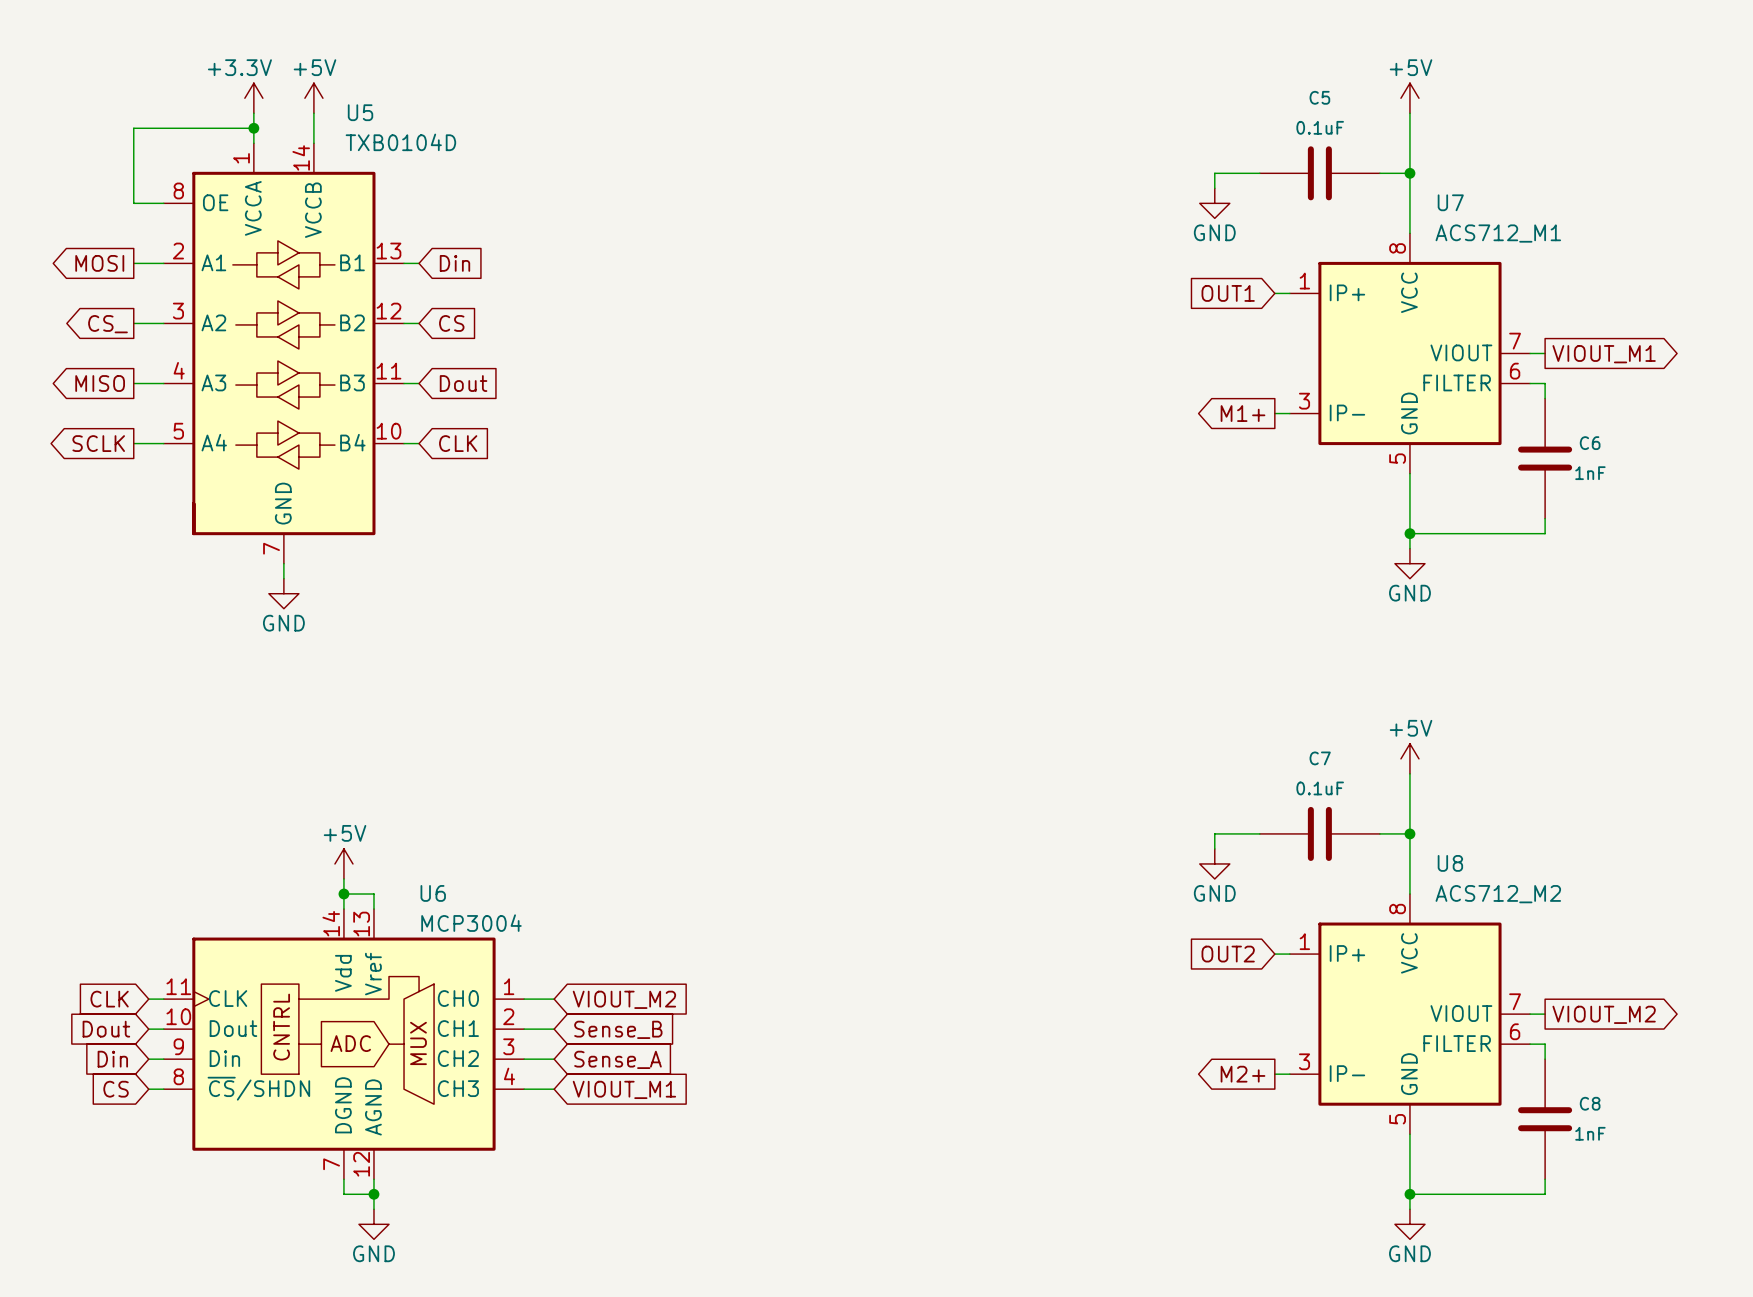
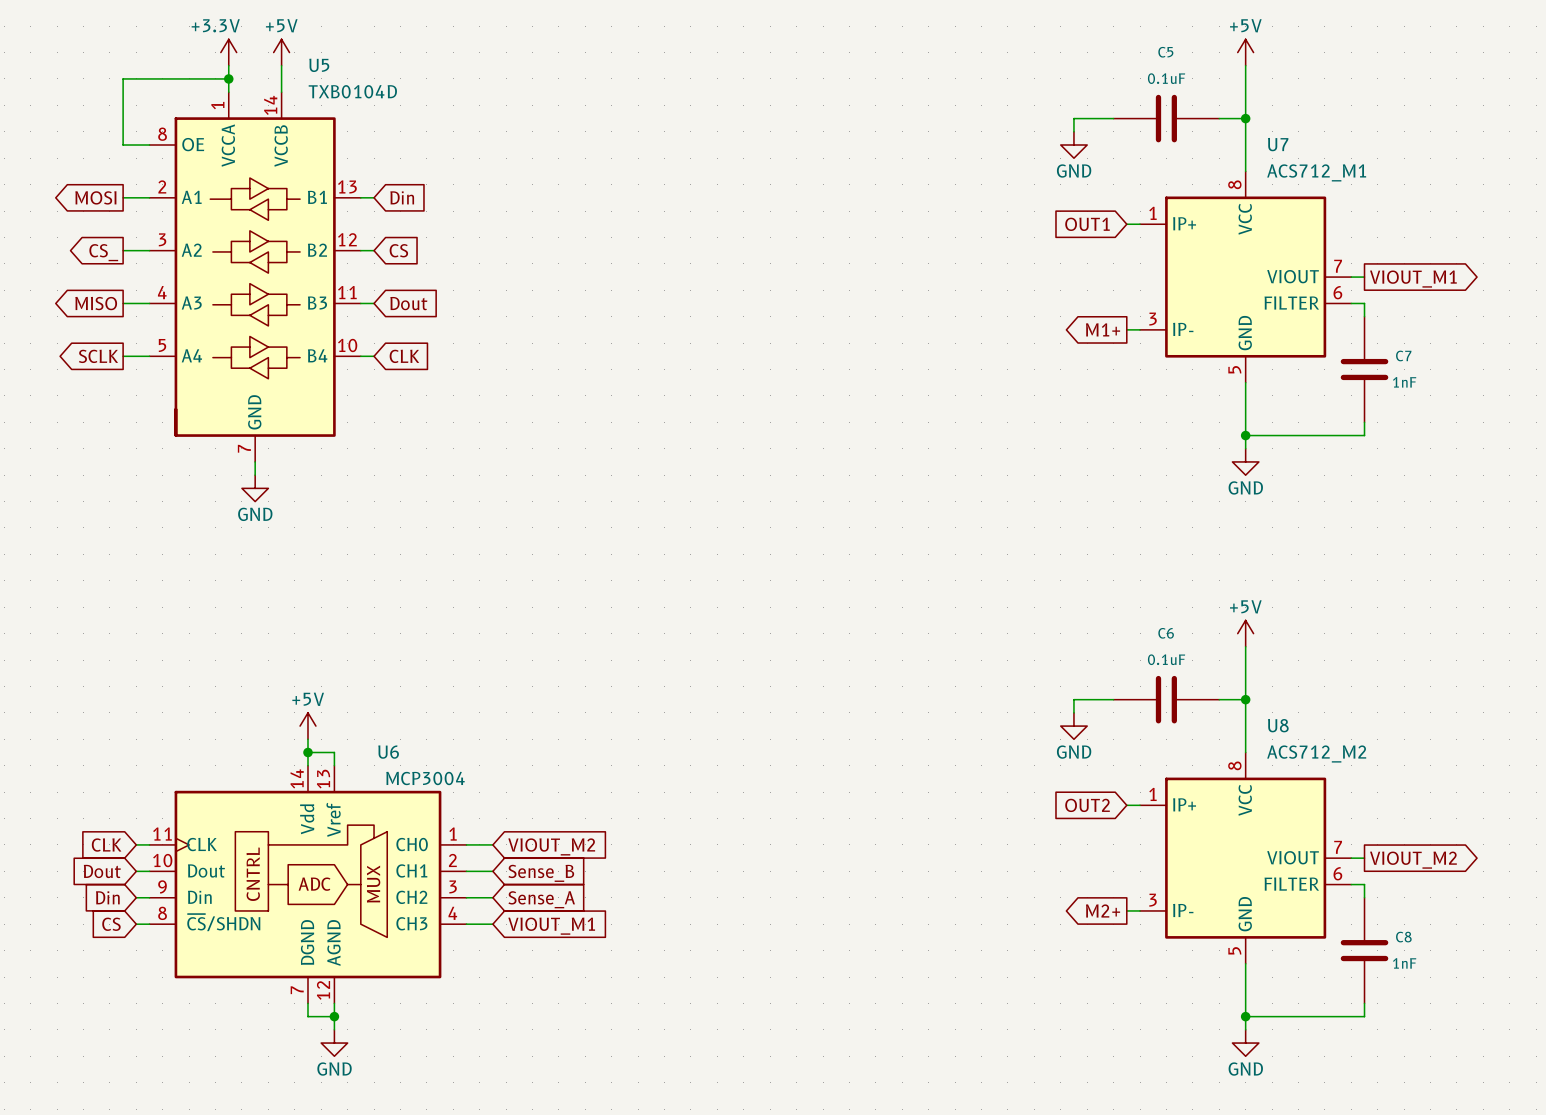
C6 name: C6 (1590, 443) -> C7 (1403, 355)
C7 name: C7 (1320, 758) -> C6 (1166, 633)

